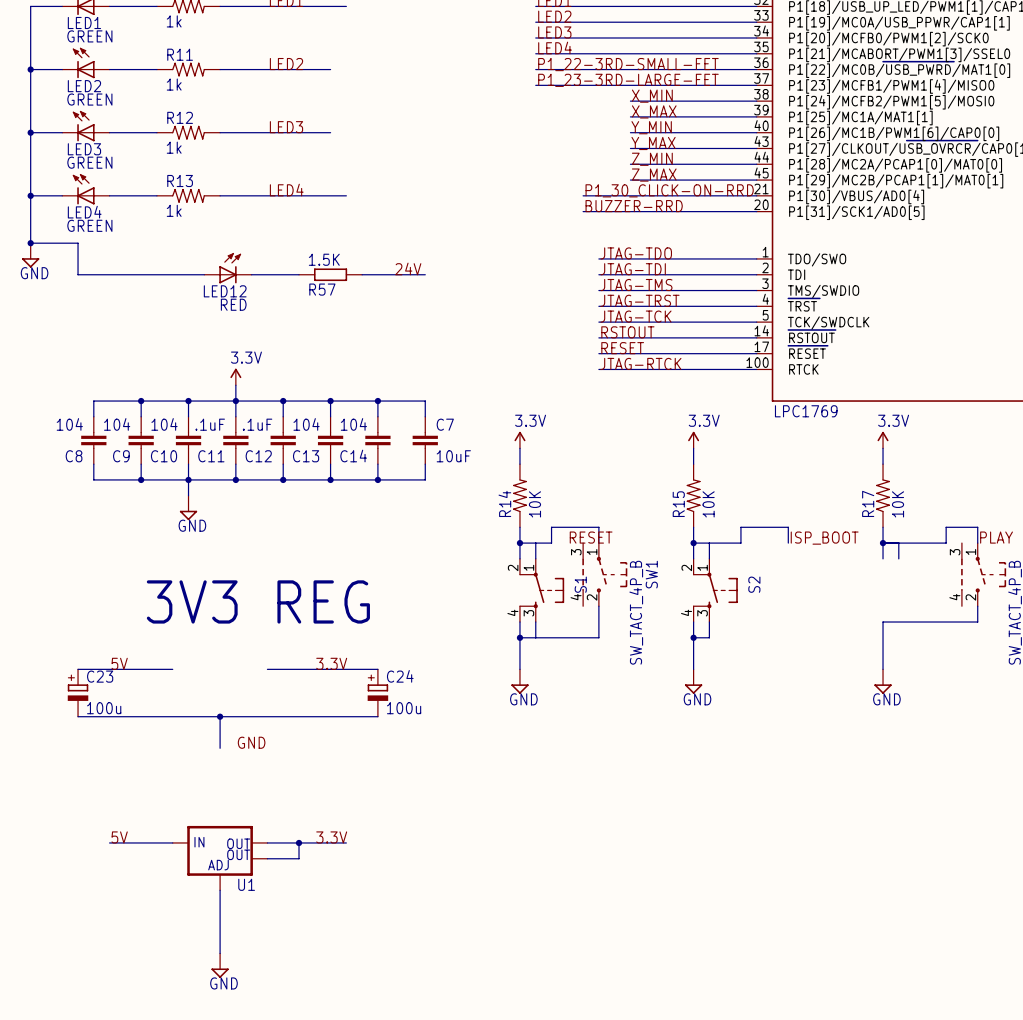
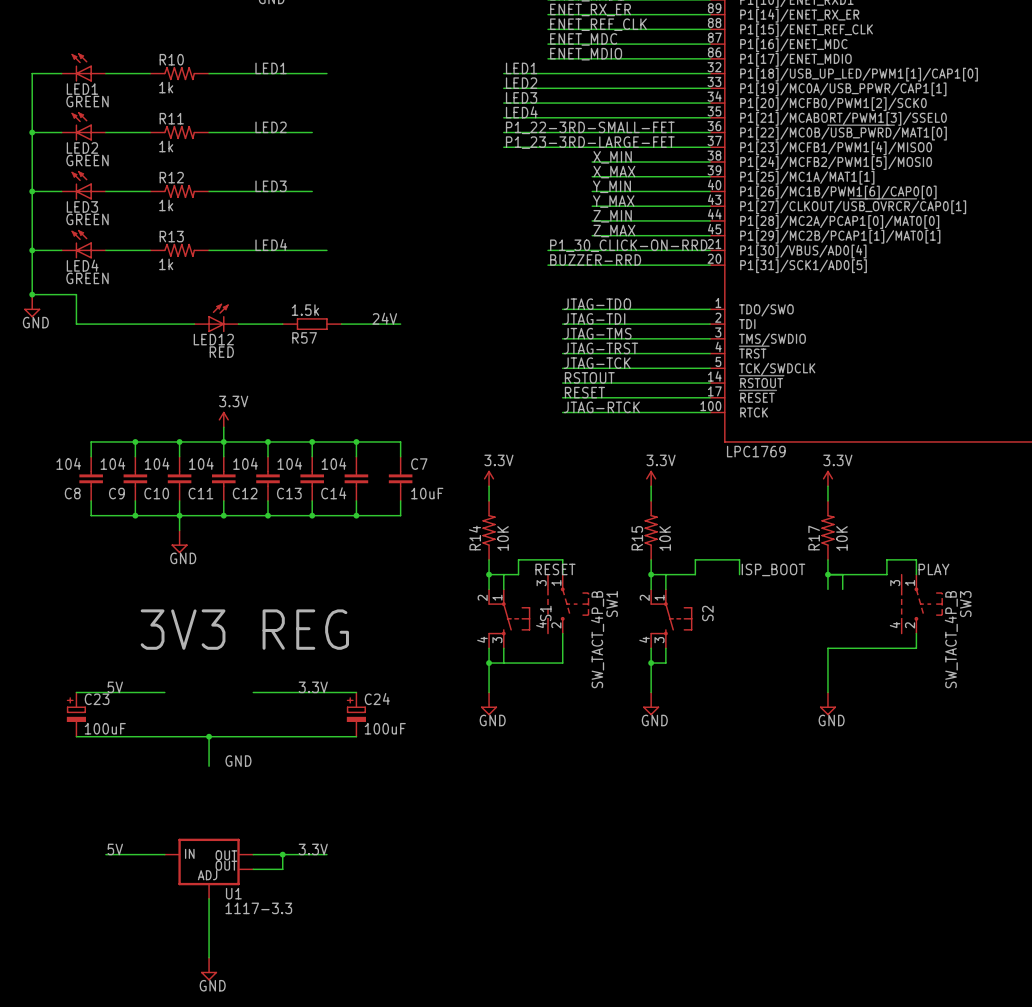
R57 value: 1.5K (324, 259) -> 1.5k (305, 310)
C11 value: .1uF (210, 424) -> 104 (201, 463)
C12 value: .1uF (257, 424) -> 104 (245, 463)
C23 value: 100u (104, 708) -> 100uF (105, 728)
C24 value: 100u (404, 708) -> 100uF (385, 728)
U1 value: none -> 1117-3.3 (258, 908)

